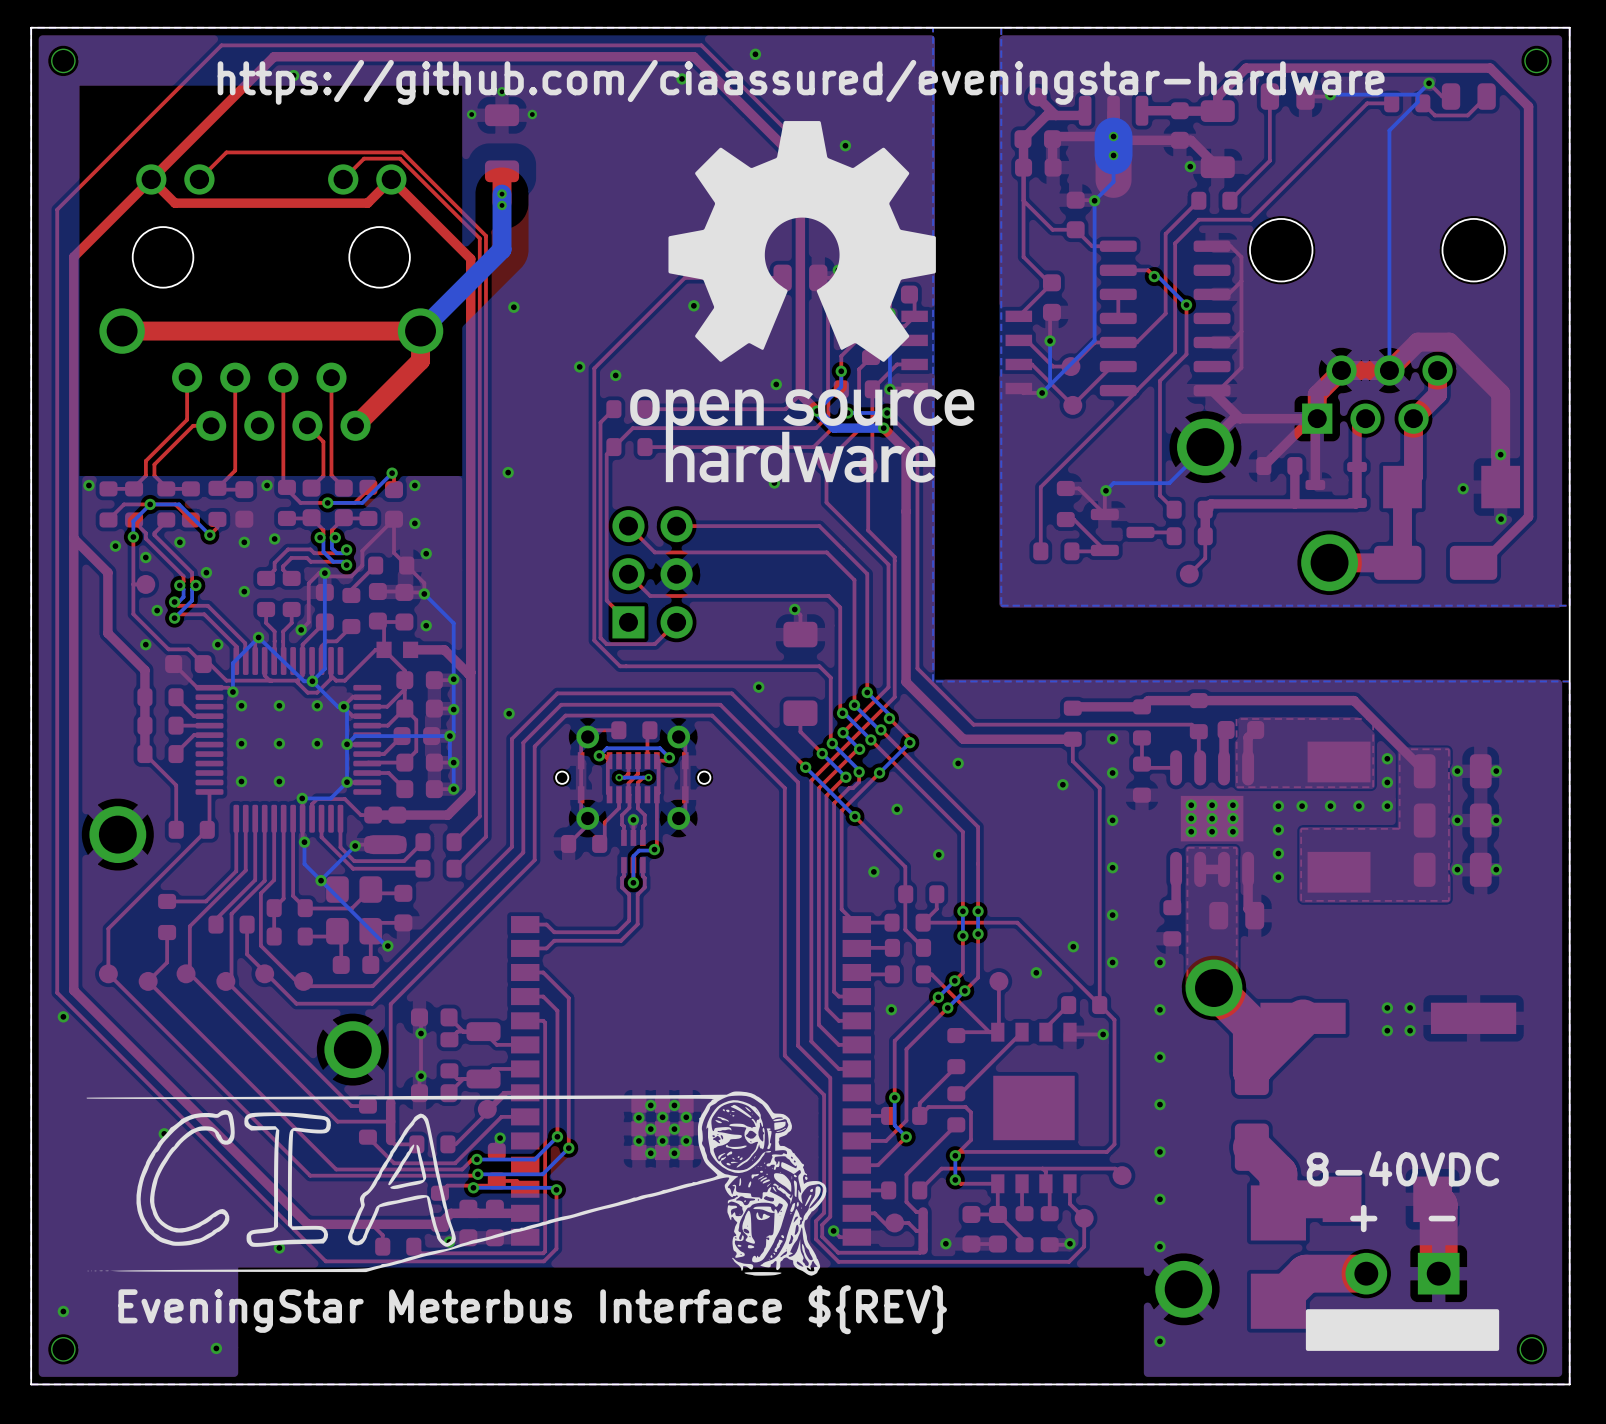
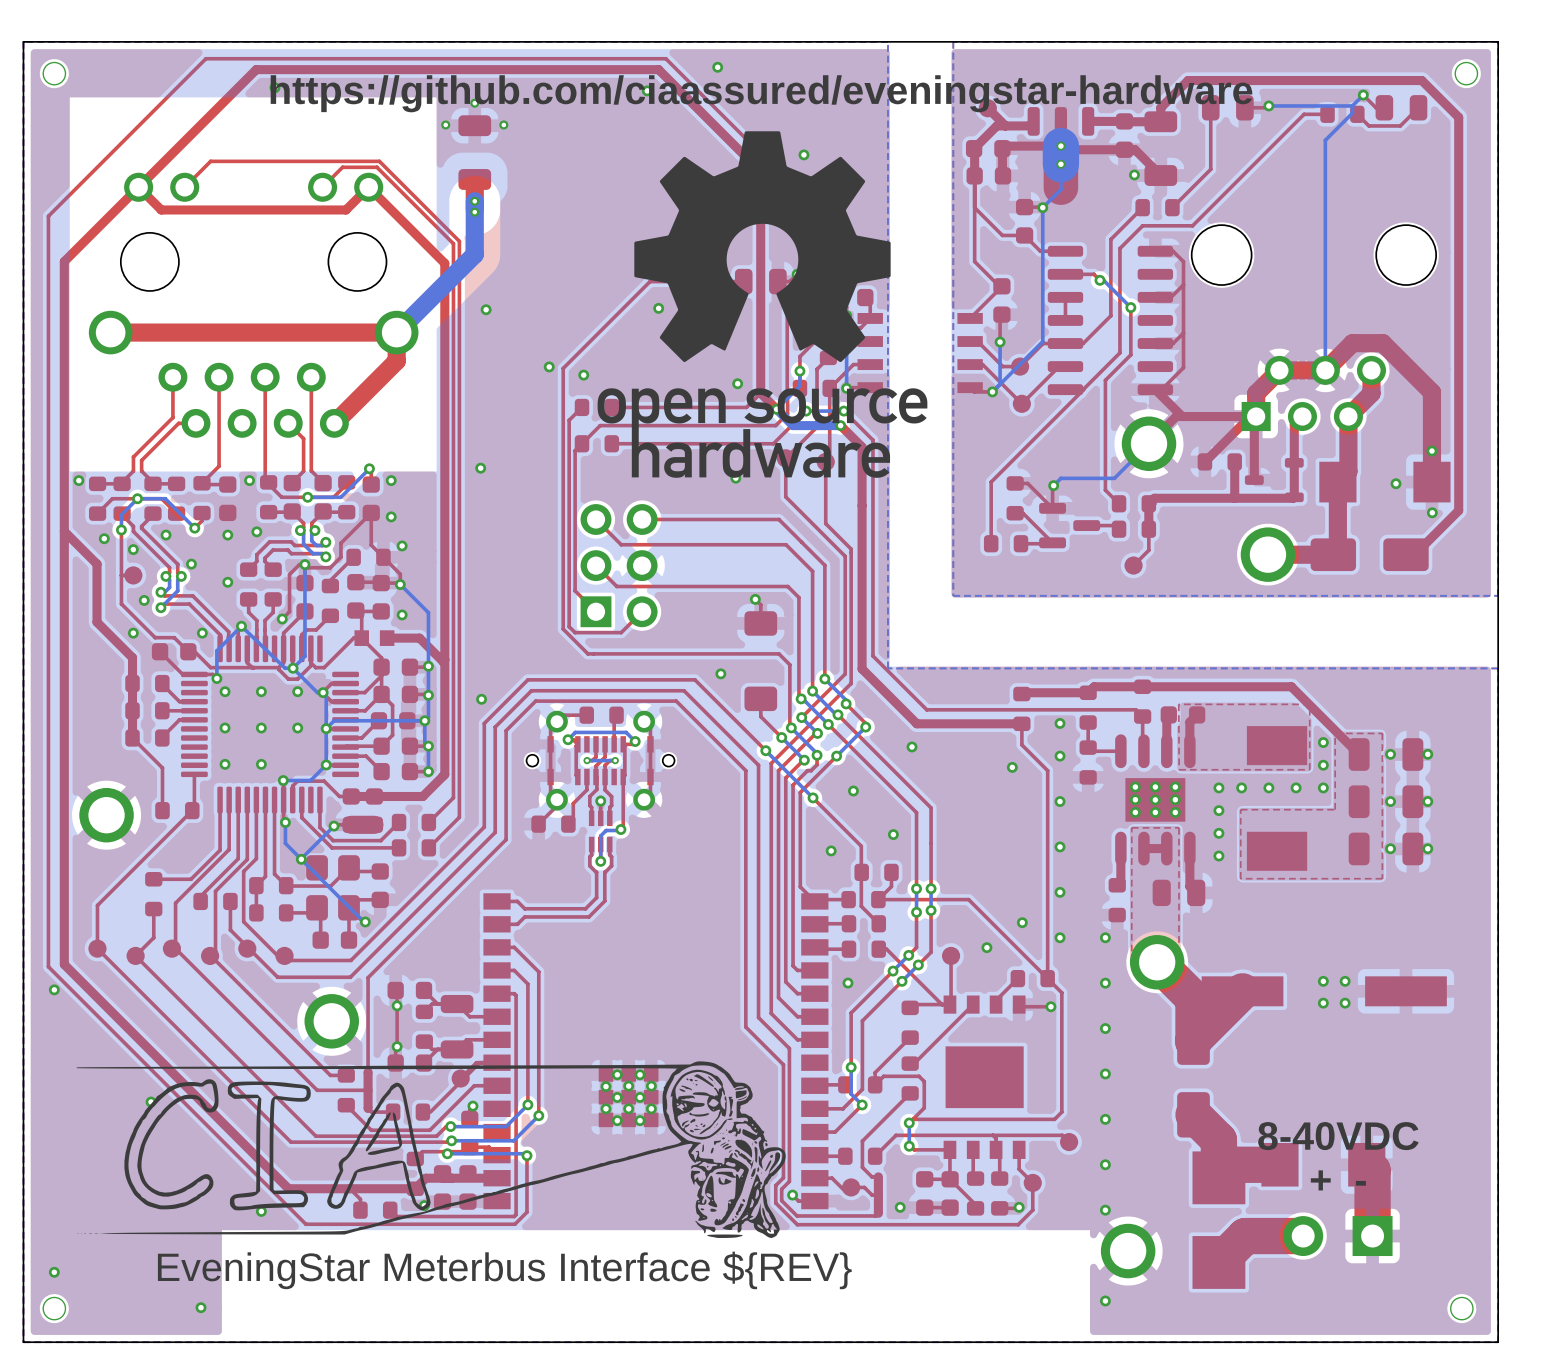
drawing: [1305, 1309, 1500, 1351] -> none

